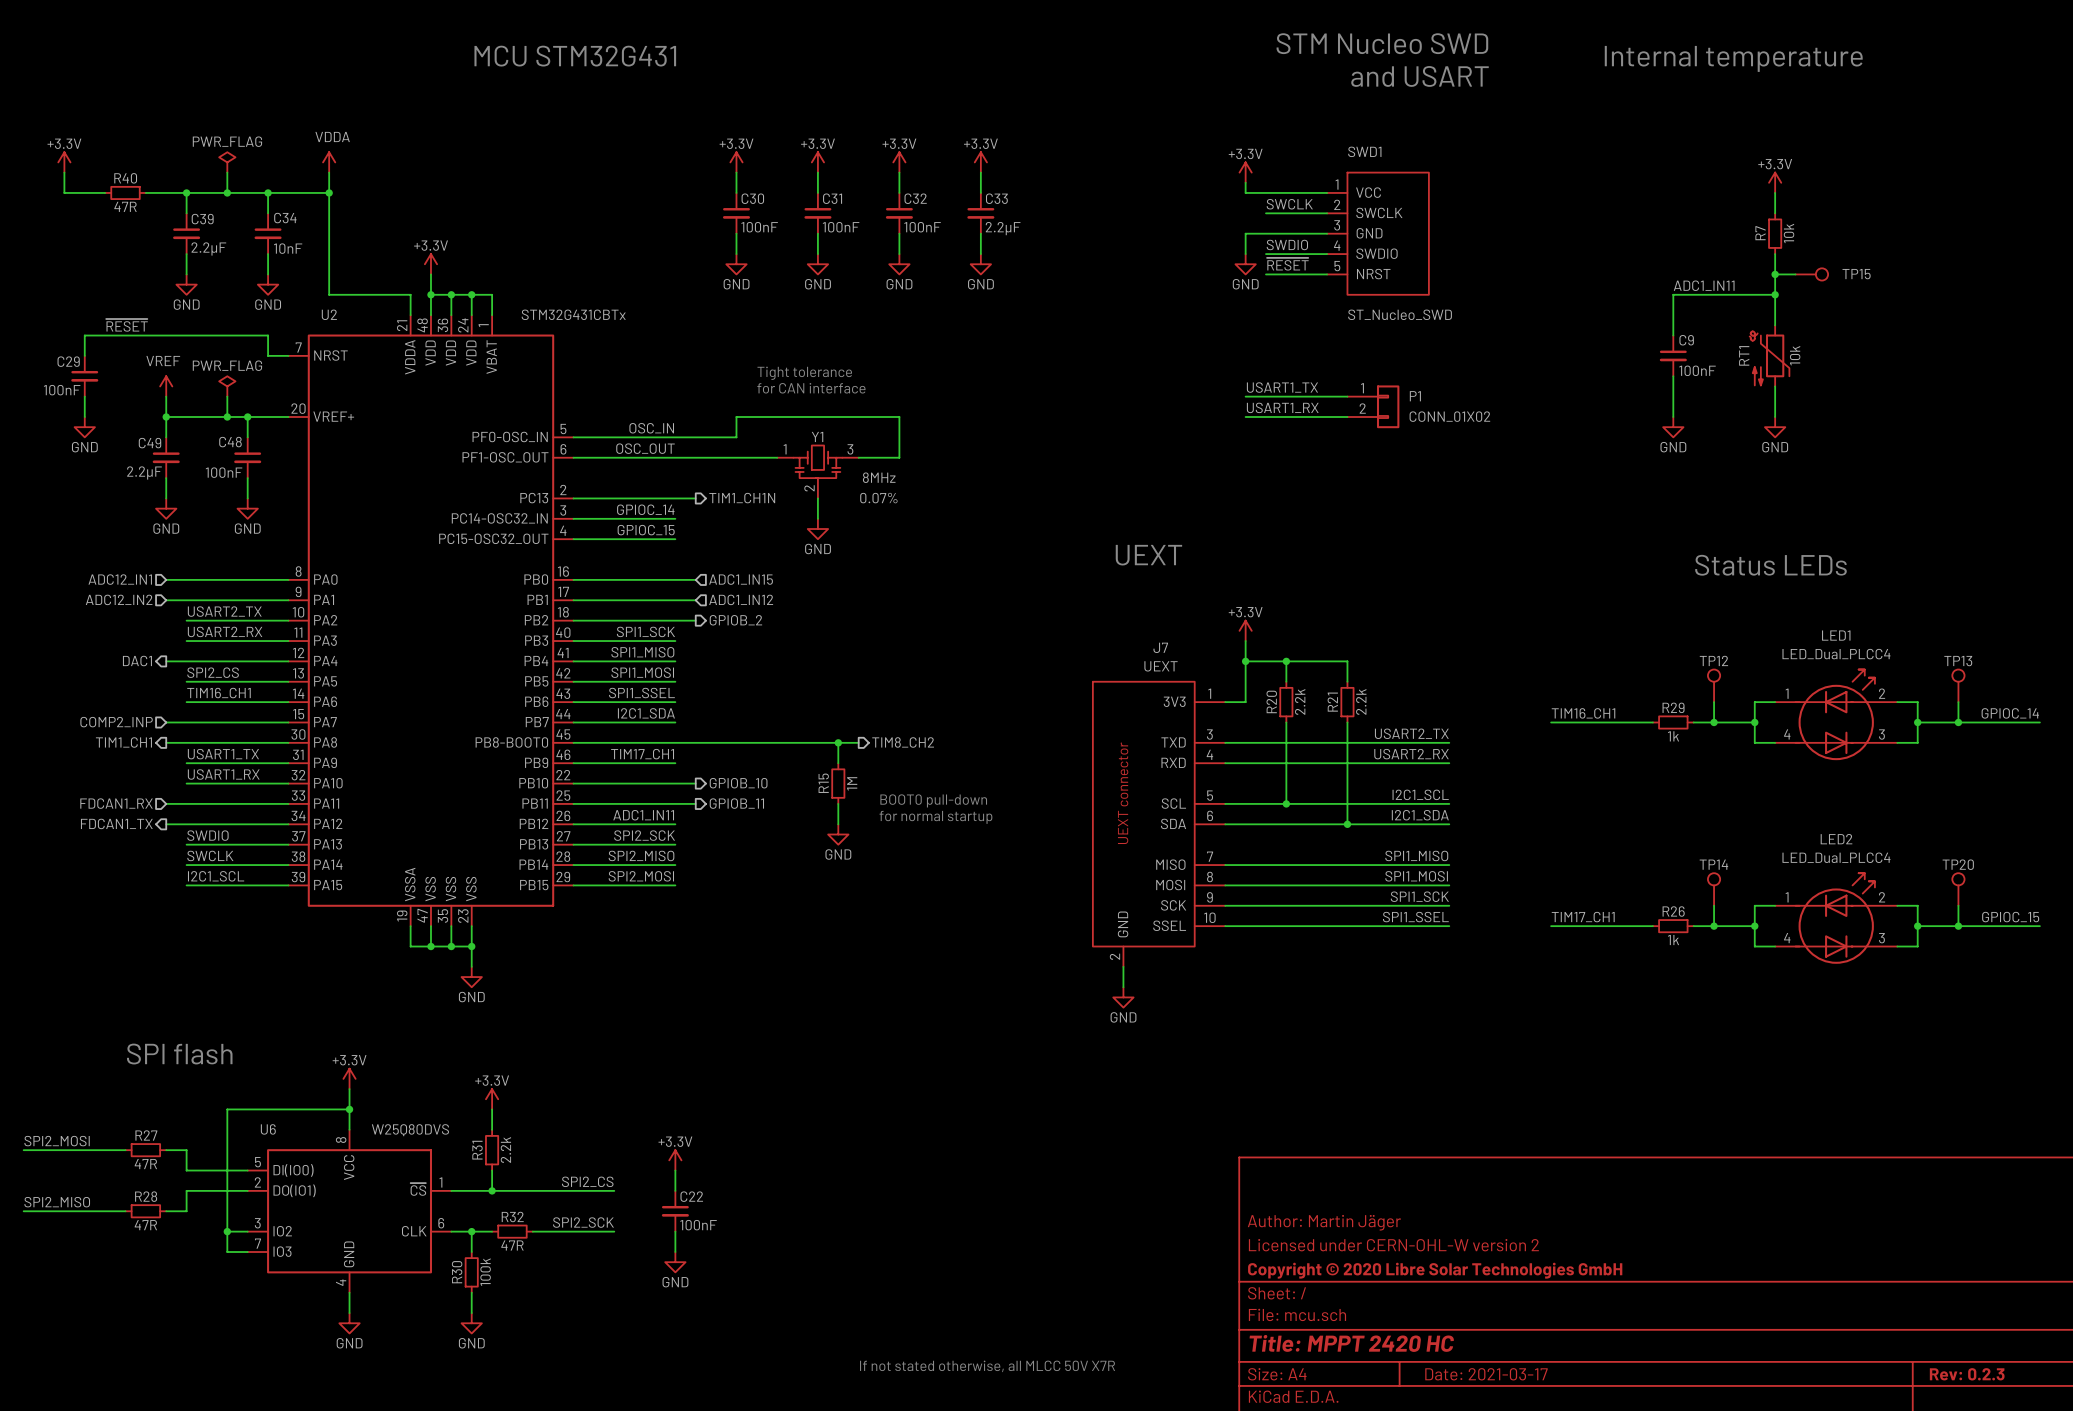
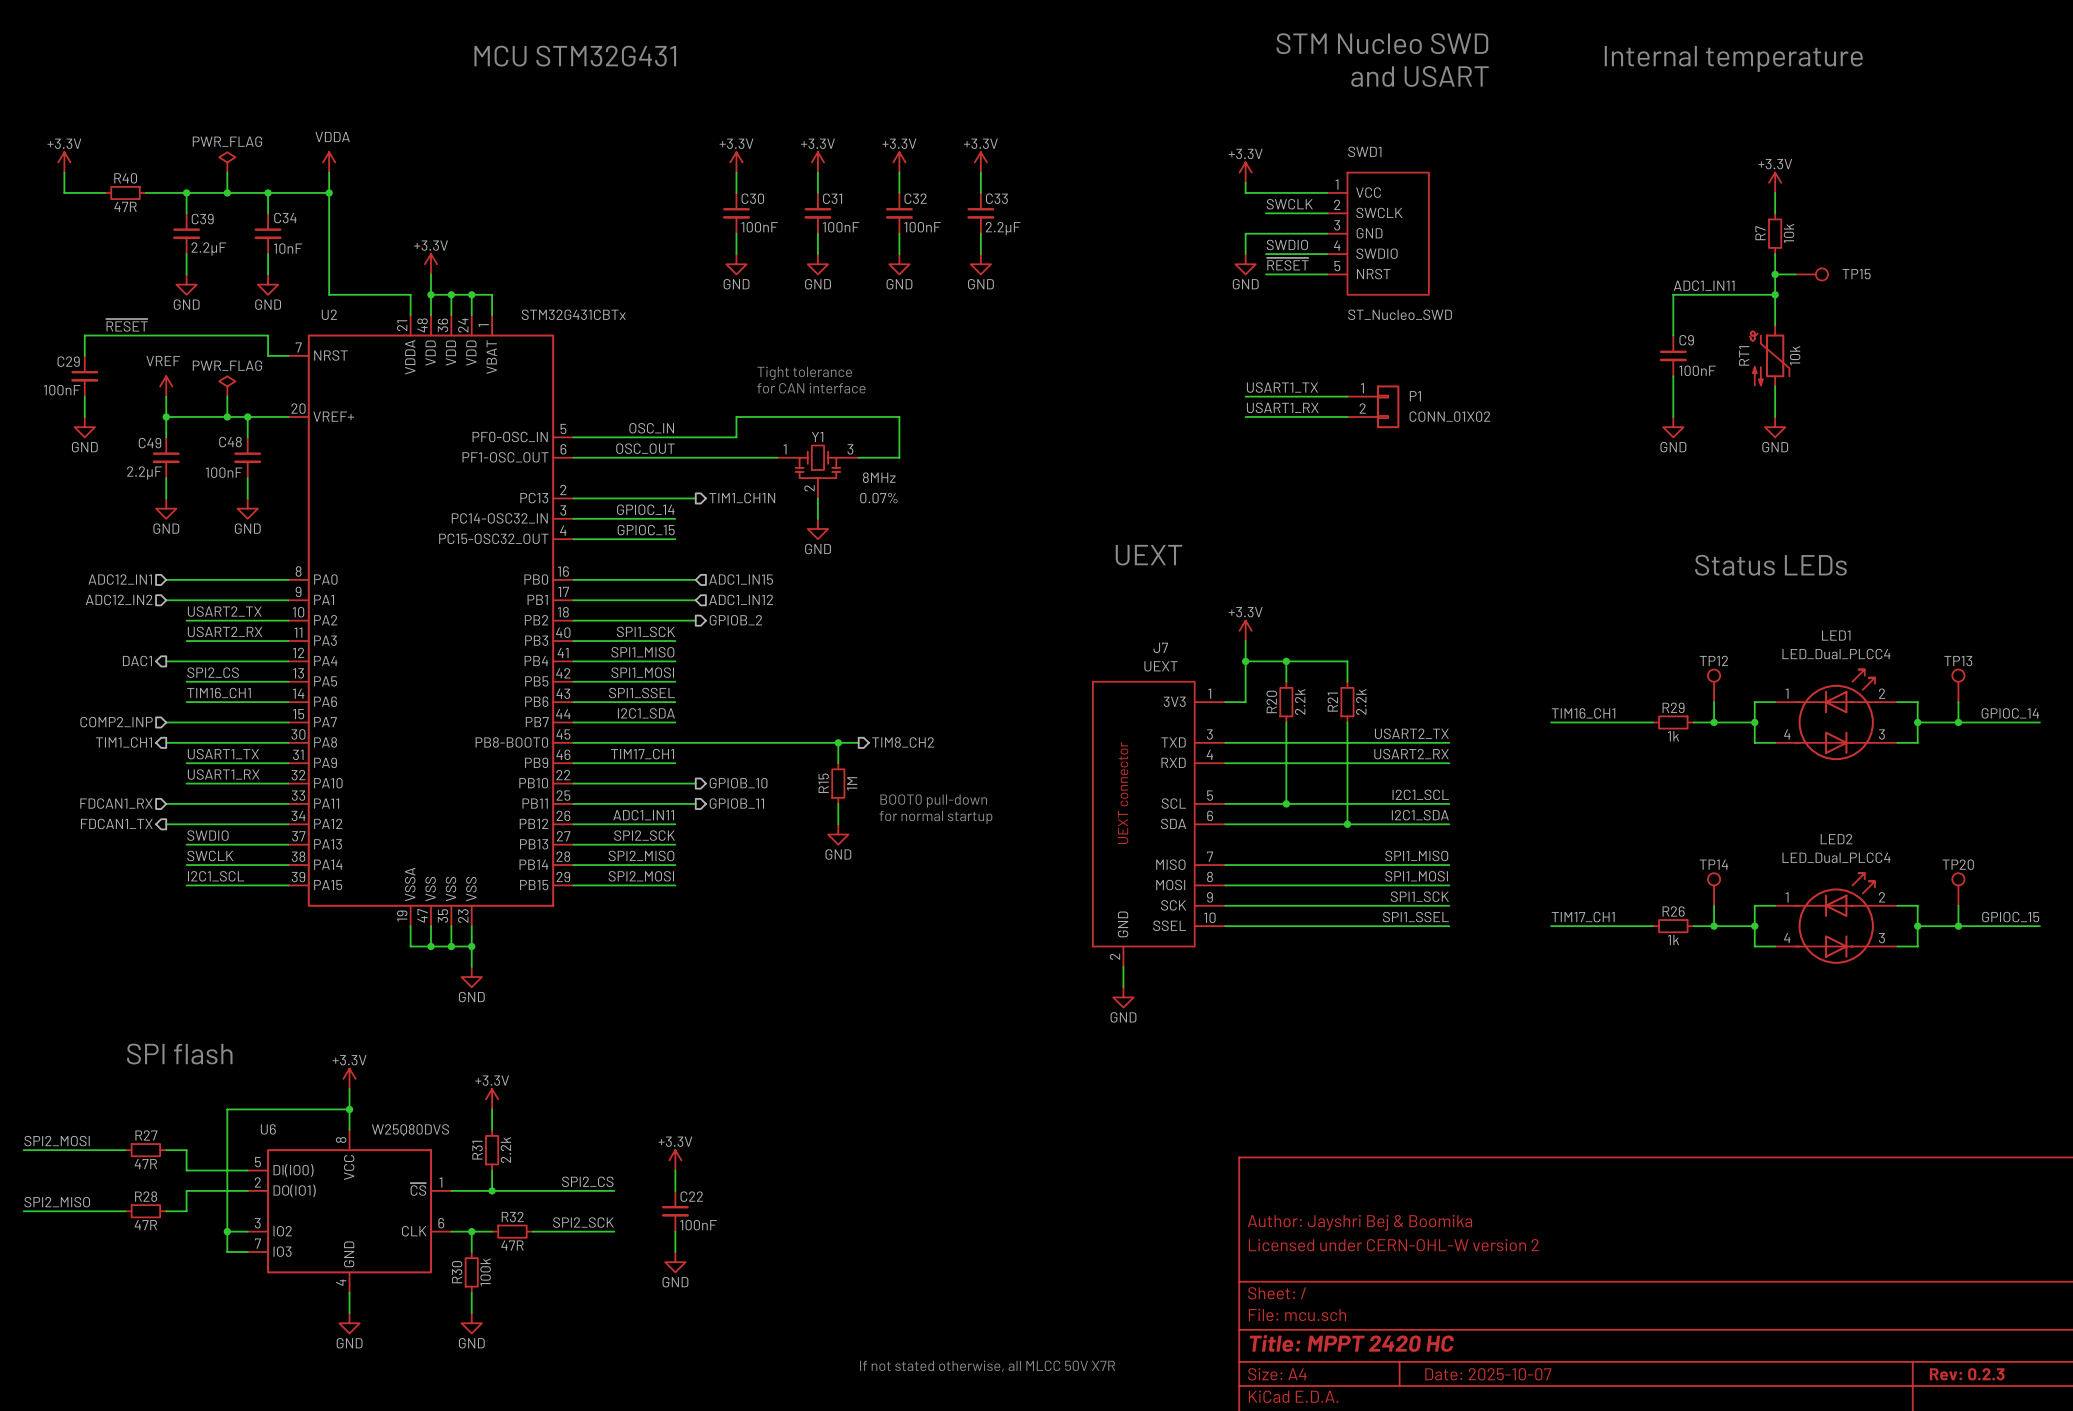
title block: Author: Martin Jäger (1324, 1222) -> Author: Jayshri Bej & Boomika (1359, 1222)
title block: Copyright © 2020 Libre Solar Technologies GmbH (1435, 1270) -> none
title block: Date: 2021-03-17 (1486, 1374) -> Date: 2025-10-07 (1488, 1374)

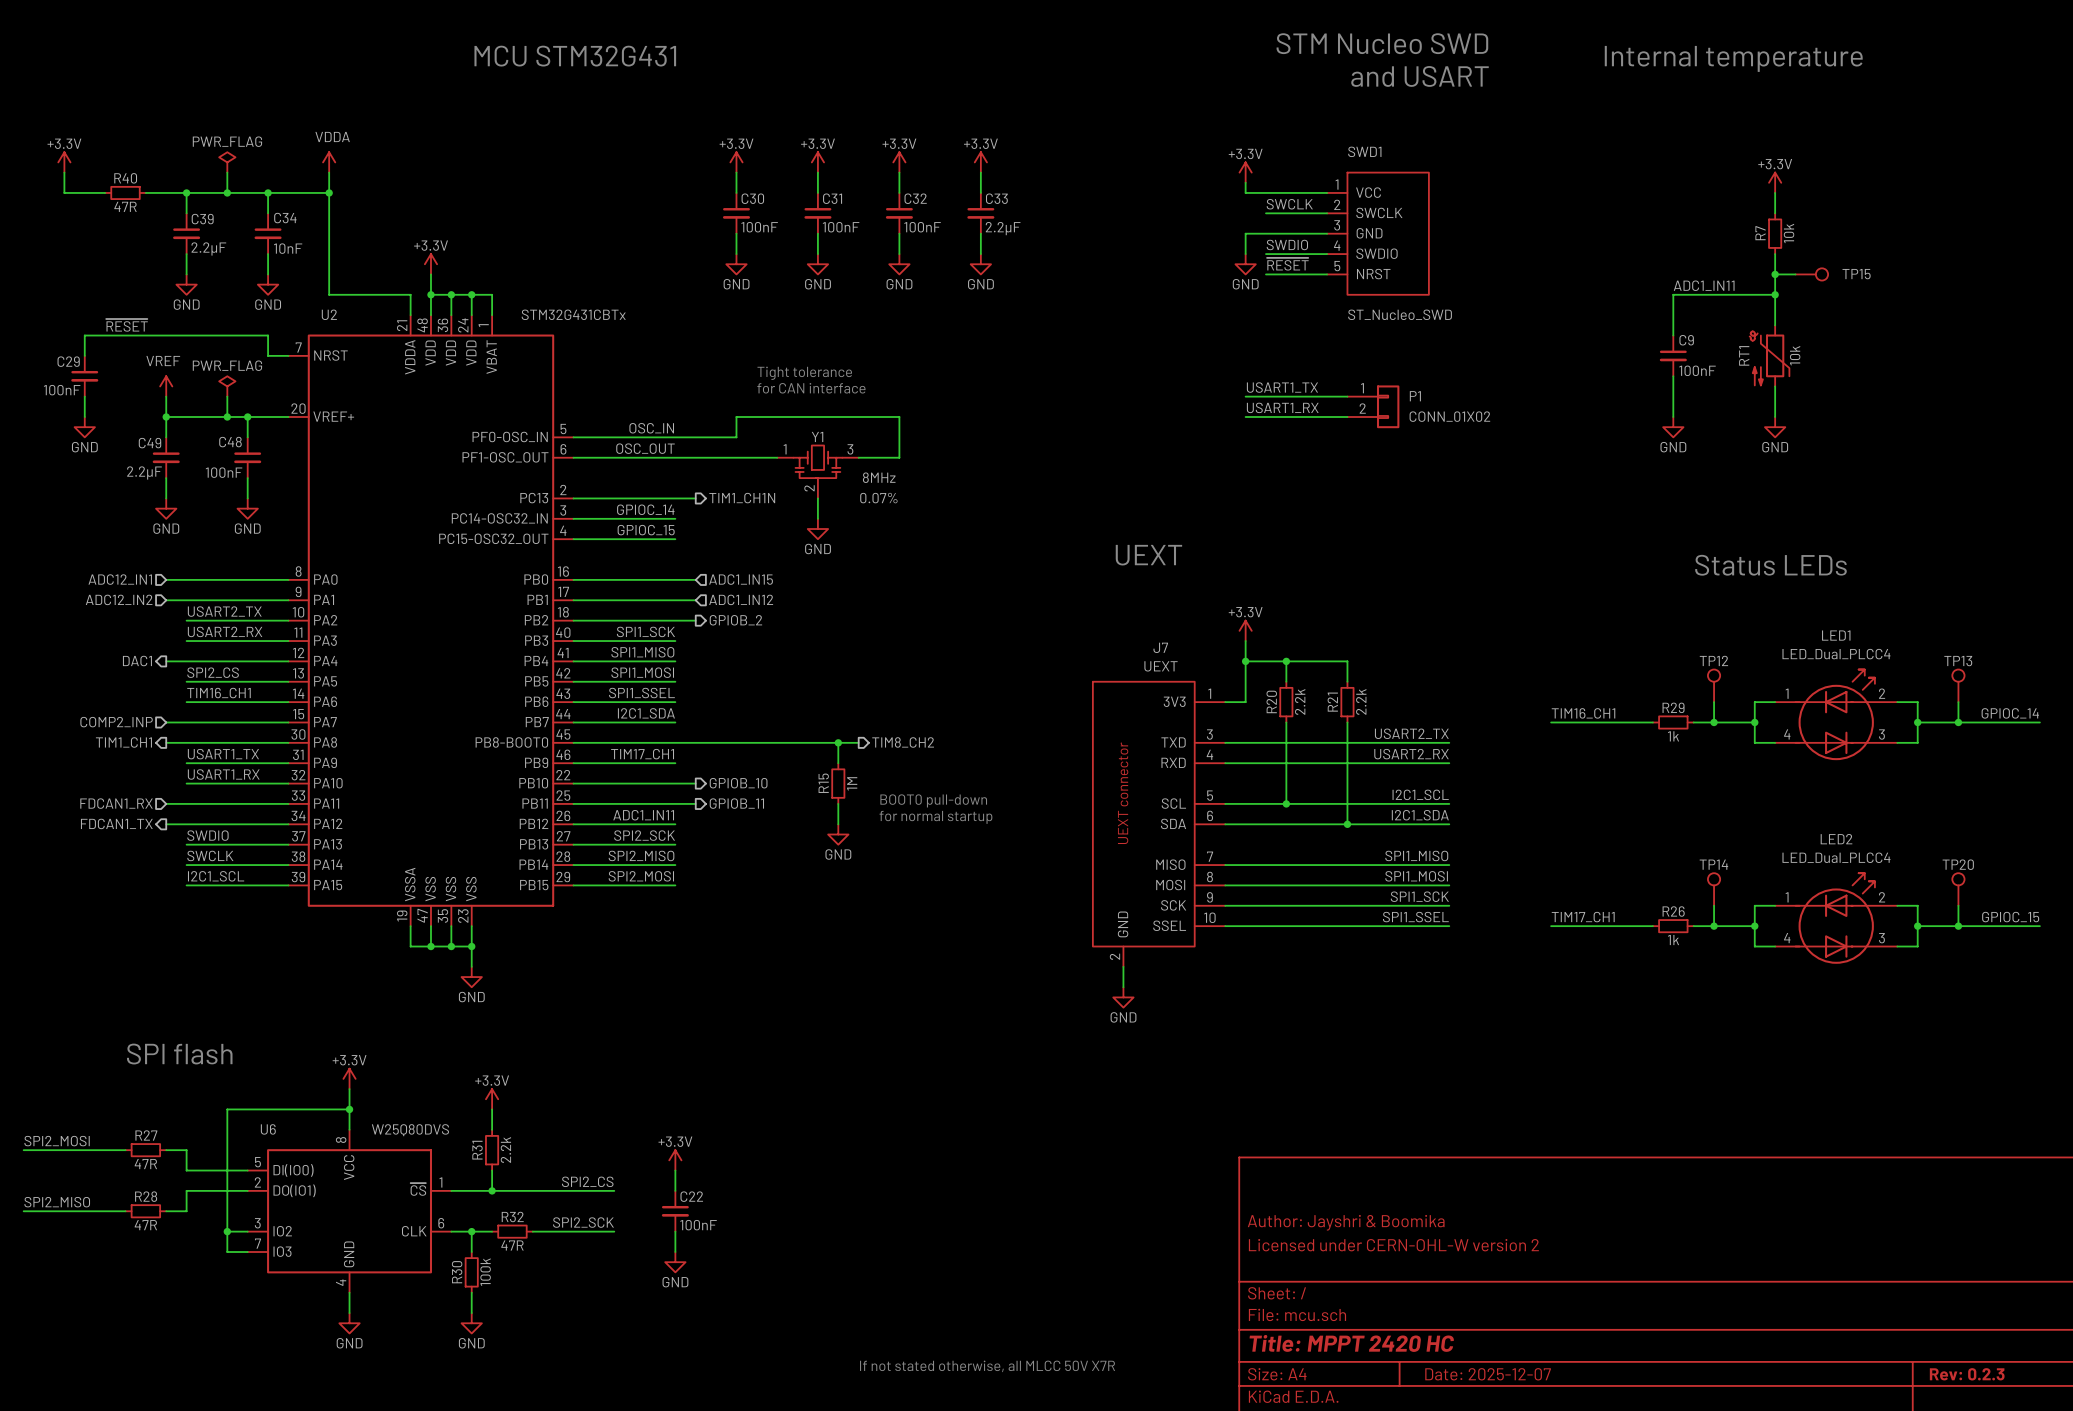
title block: Author: Jayshri Bej & Boomika (1359, 1222) -> Author: Jayshri & Boomika (1346, 1222)
title block: Date: 2025-10-07 (1488, 1374) -> Date: 2025-12-07 (1488, 1374)

